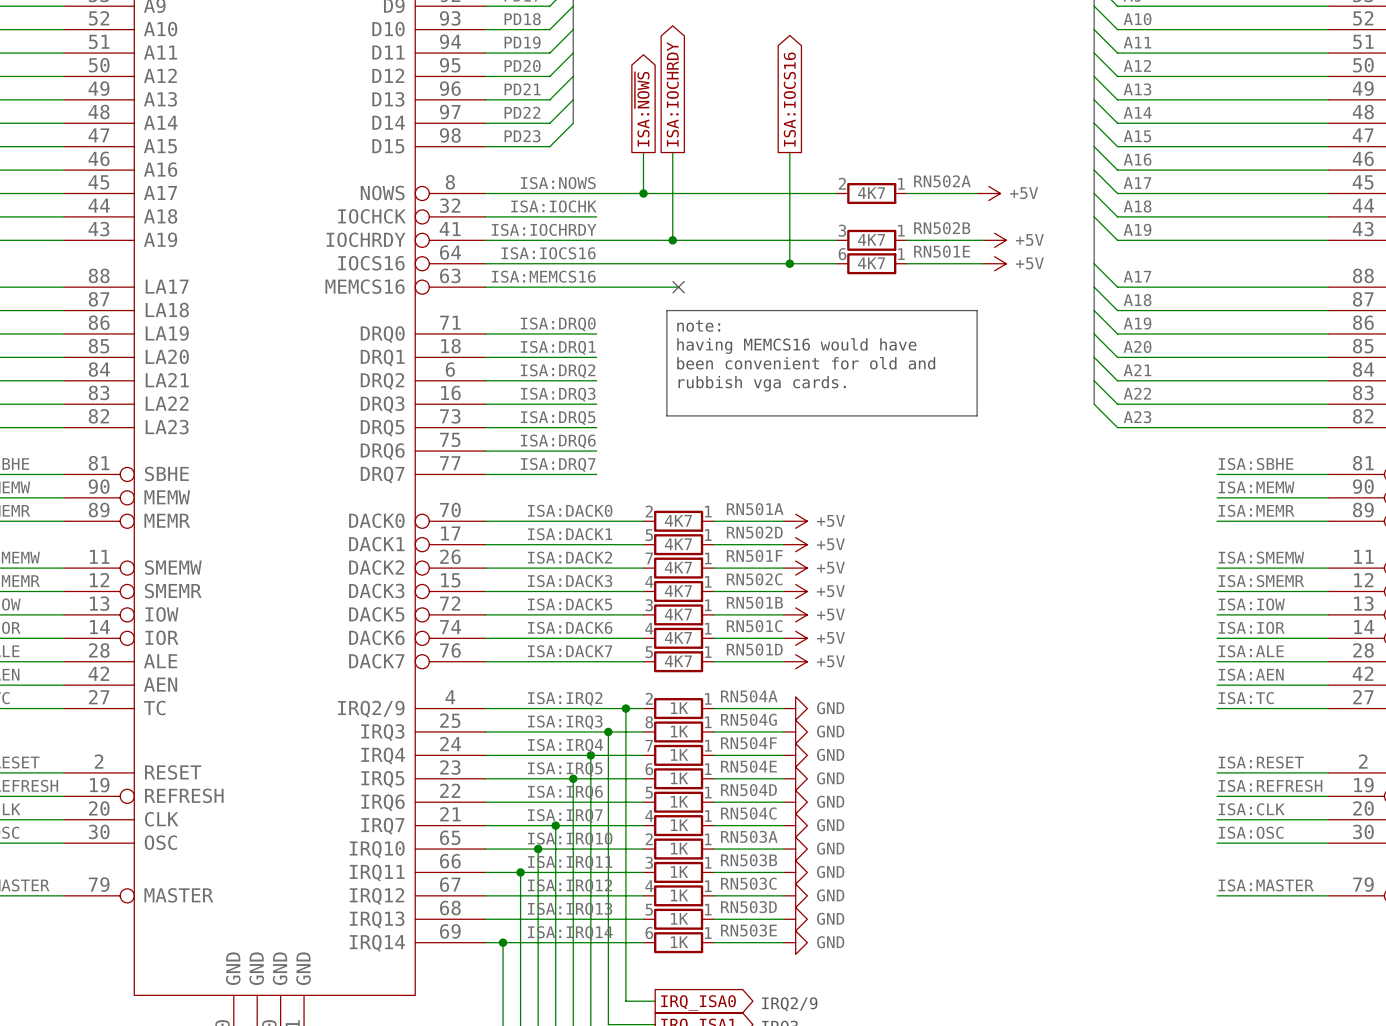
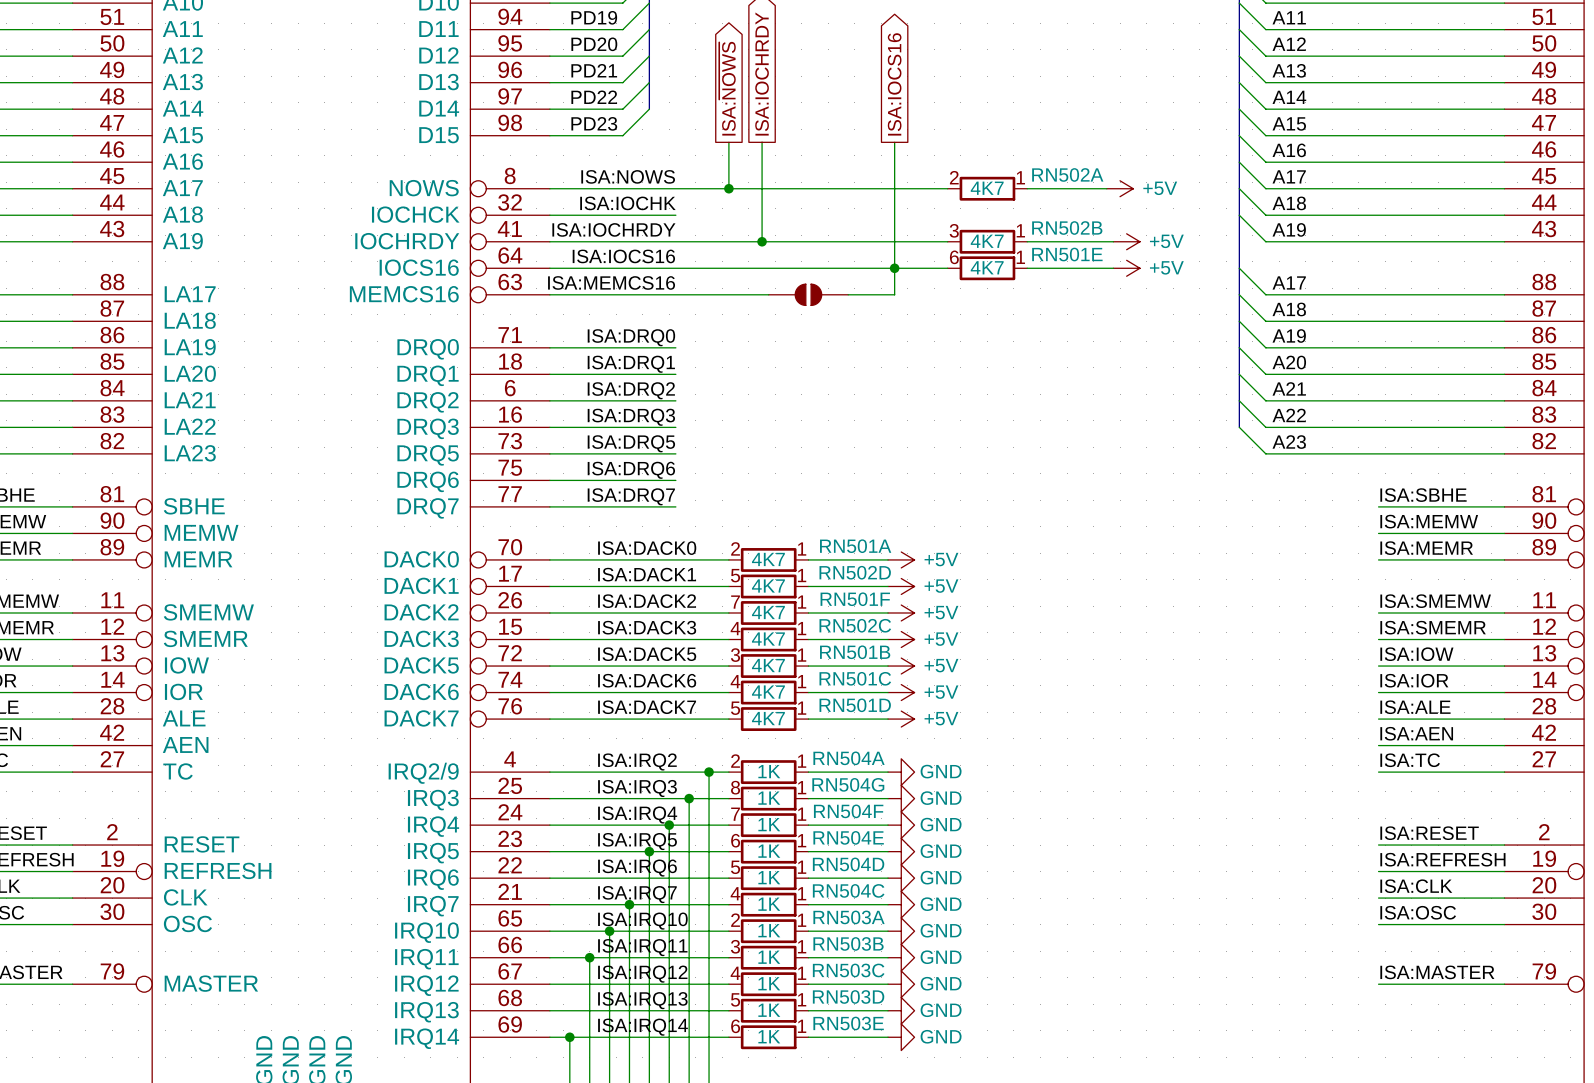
wire: none -> (894, 268) (894, 294) (848, 294)
no-connect mark: (678, 287) -> none
part: none -> (808, 294)
line: (666, 310) (977, 310) (977, 415) (666, 415) (666, 310) -> none
text: note: (698, 326) -> none
text: having MEMCS16 would have (796, 346) -> none
text: been convenient for old and (806, 363) -> none
text: rubbish vga cards. (762, 383) -> none

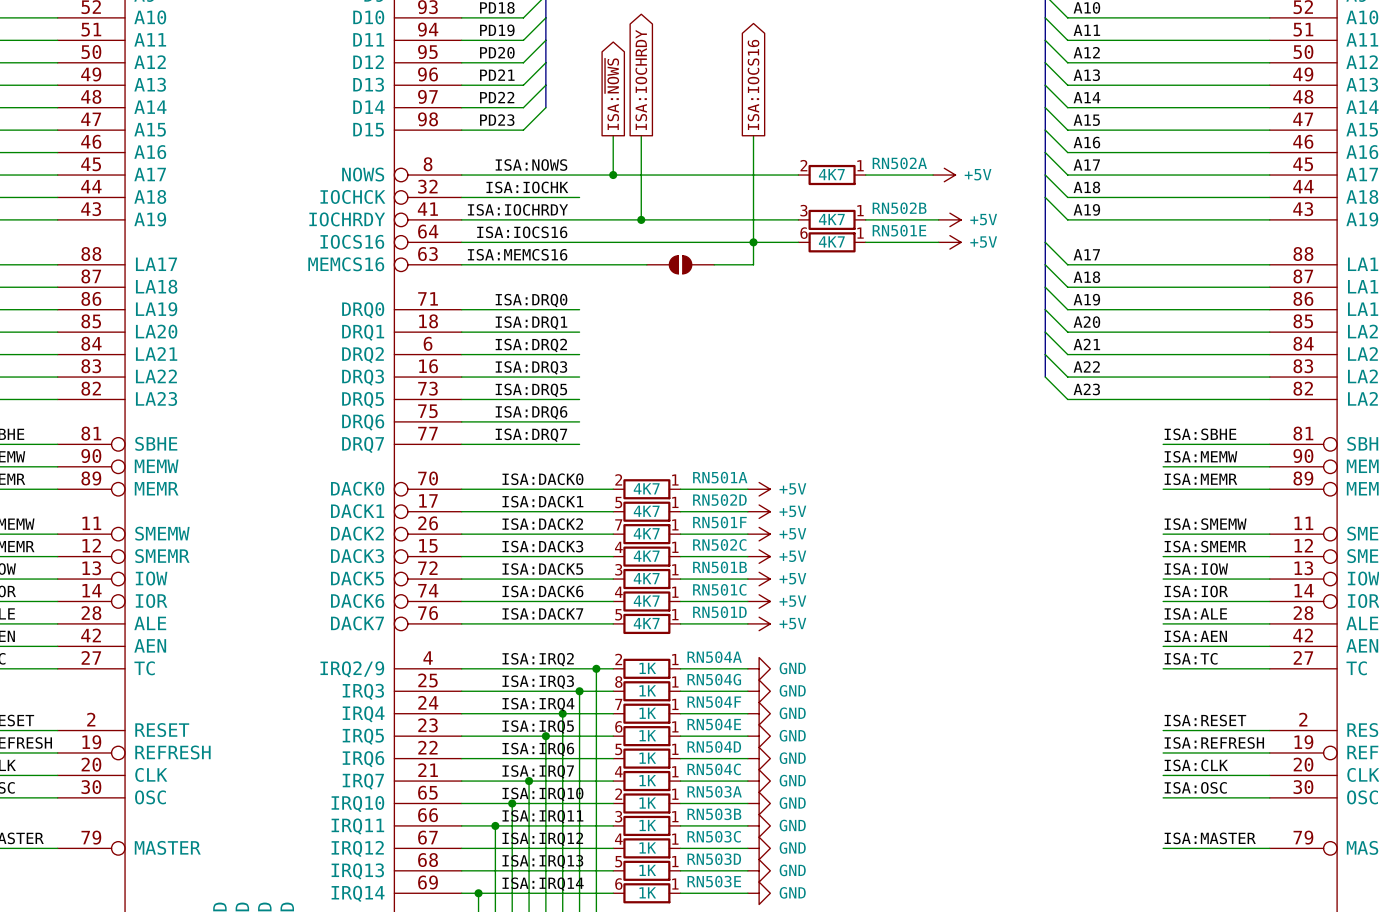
wire: none -> (568, 197) (579, 197)
wire: none -> (568, 309) (579, 309)
wire: none -> (568, 332) (579, 332)
wire: none -> (568, 354) (579, 354)
wire: none -> (568, 377) (579, 377)
wire: none -> (568, 399) (579, 399)
wire: none -> (568, 421) (579, 421)
wire: none -> (568, 444) (579, 444)

